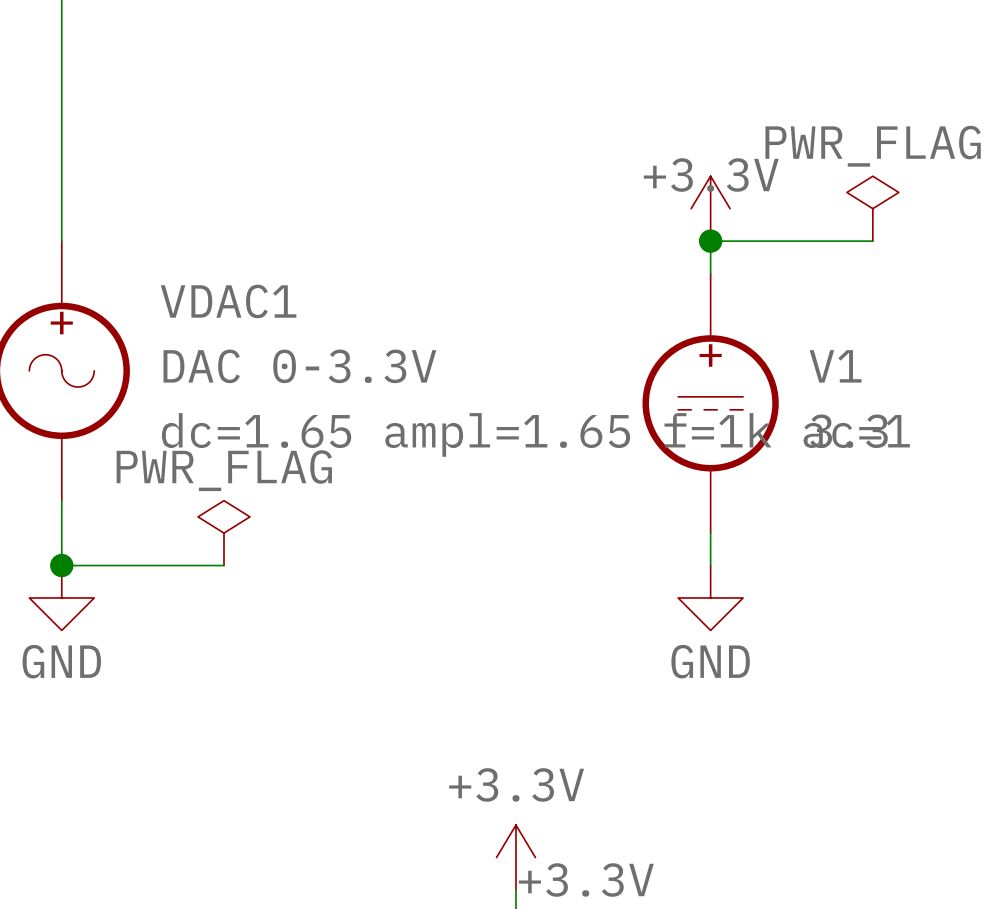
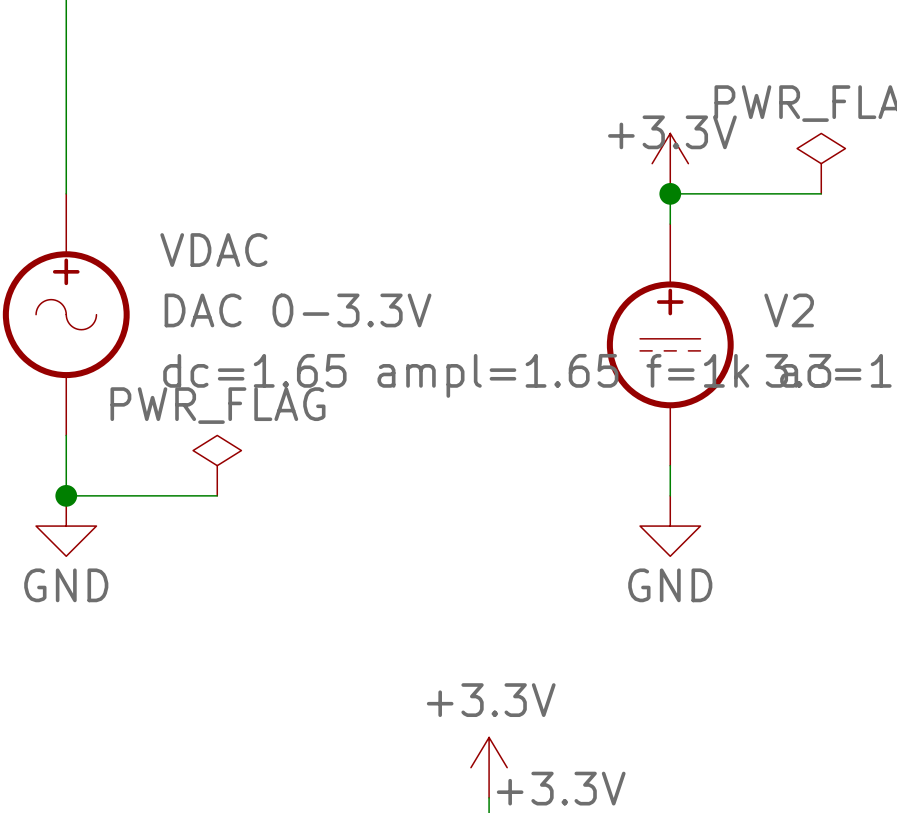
VDAC1 name: VDAC1 (228, 301) -> VDAC (213, 250)
V1 name: V1 (835, 366) -> V2 (789, 310)

